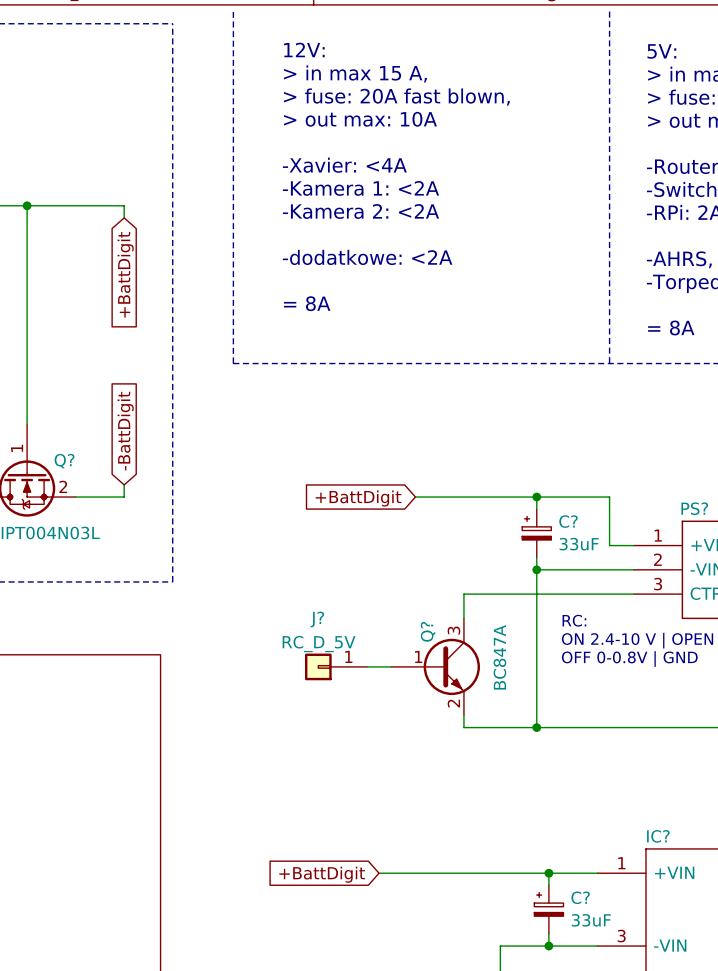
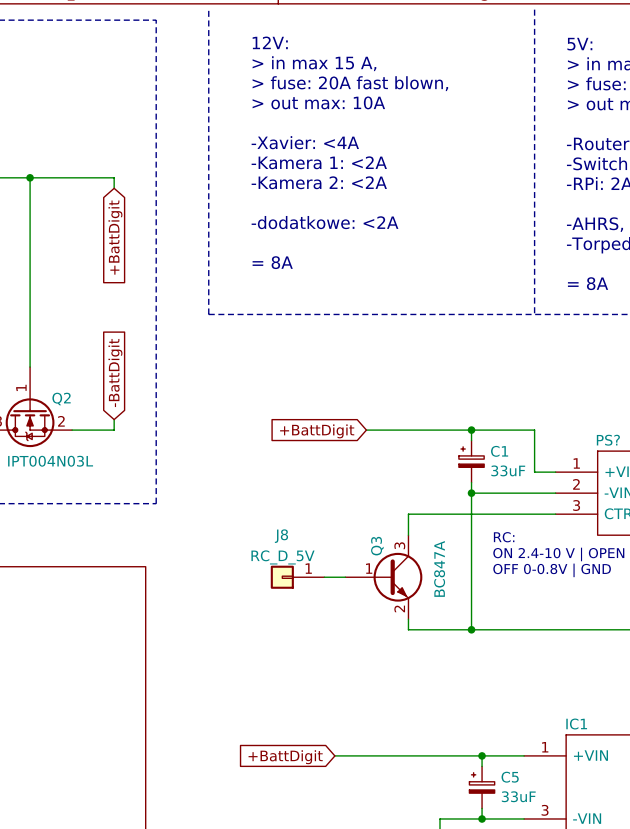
Q? name: Q? (64, 461) -> Q2 (61, 398)
C? name: C? (568, 521) -> C1 (499, 451)
J? name: J? (317, 619) -> J8 (281, 536)
Q? name: Q? (428, 631) -> Q3 (377, 546)
IC? name: IC? (658, 836) -> IC1 (576, 724)
C? name: C? (580, 897) -> C5 (510, 777)

